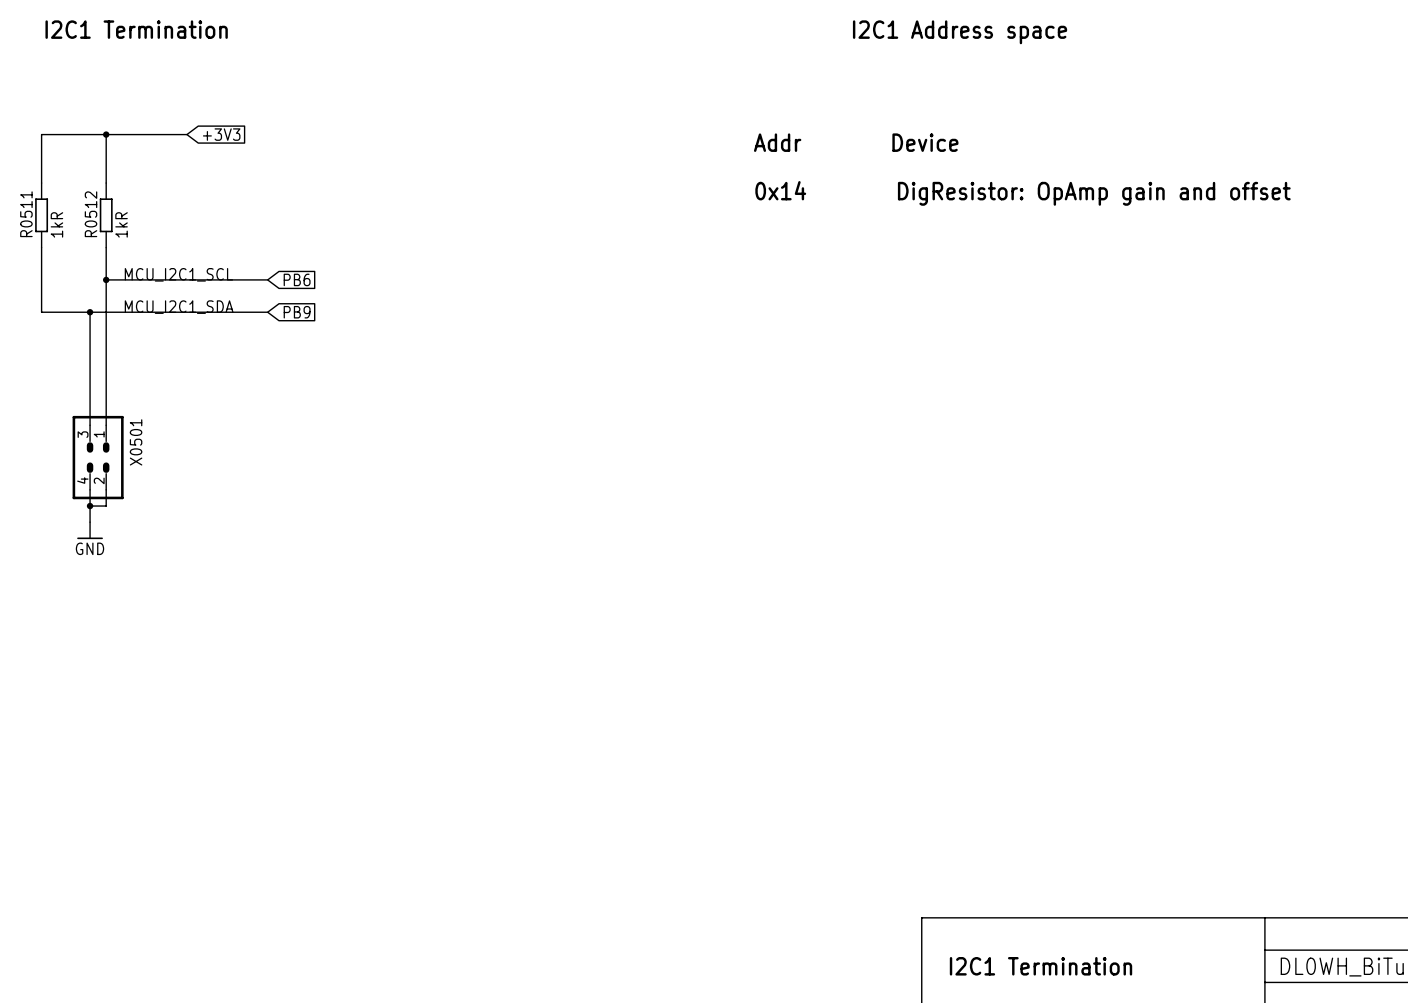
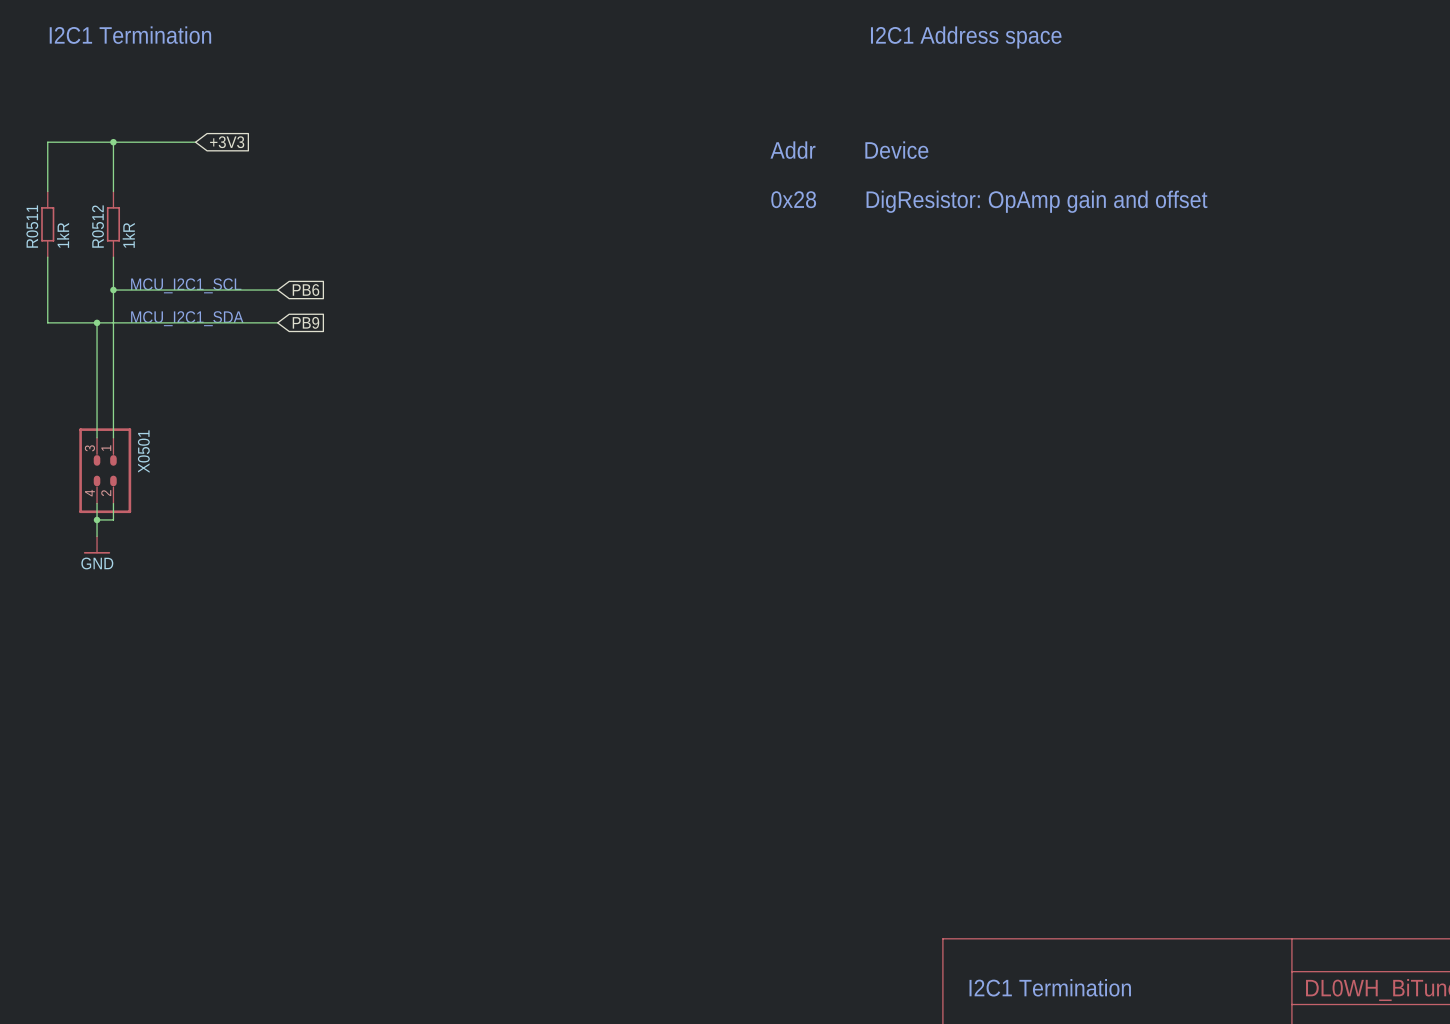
text: 0x14 DigResistor: OpAmp gain and offset (1023, 193) -> 0x28 DigResistor: OpAmp gain and offset (989, 201)

